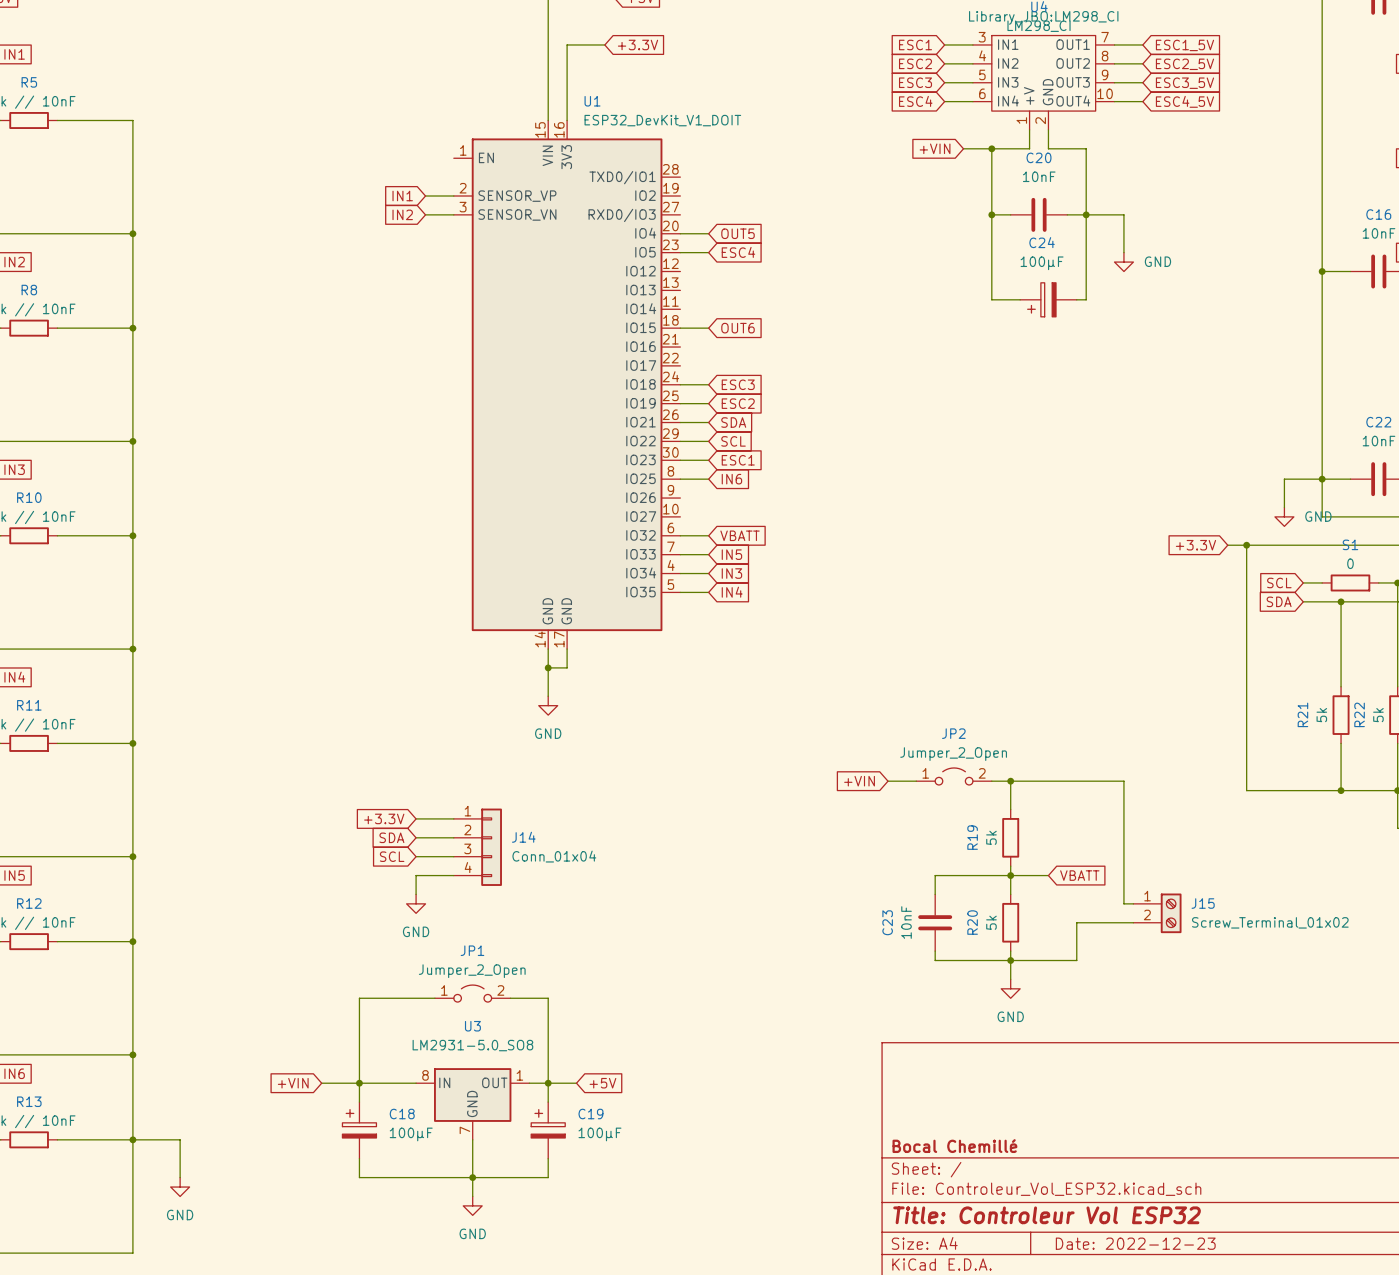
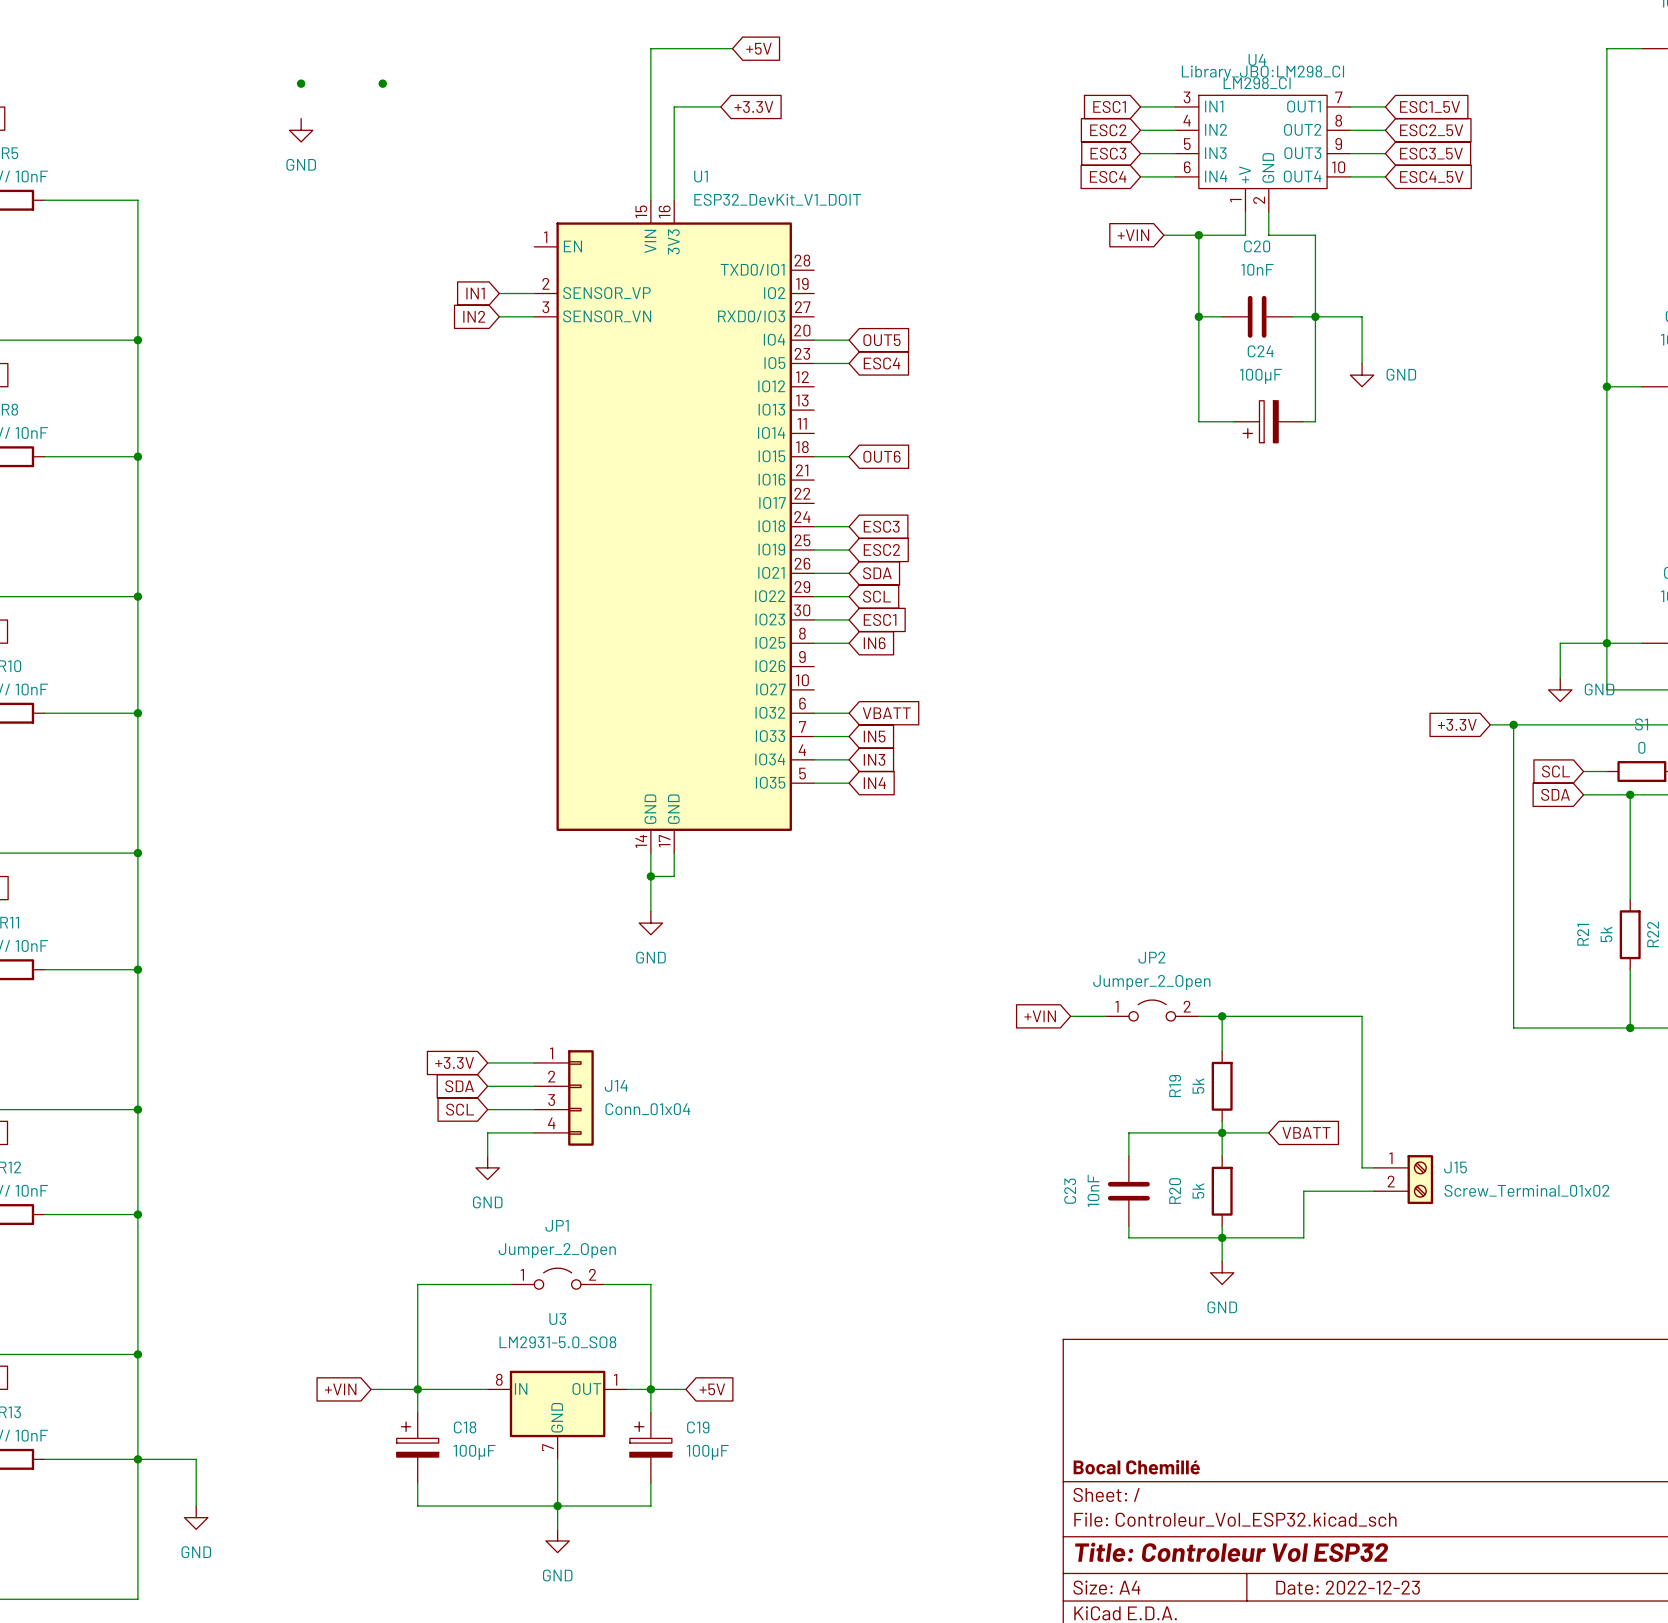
junction: none -> (301, 83)
junction: none -> (382, 83)
power symbol: none -> GND (301, 130)

